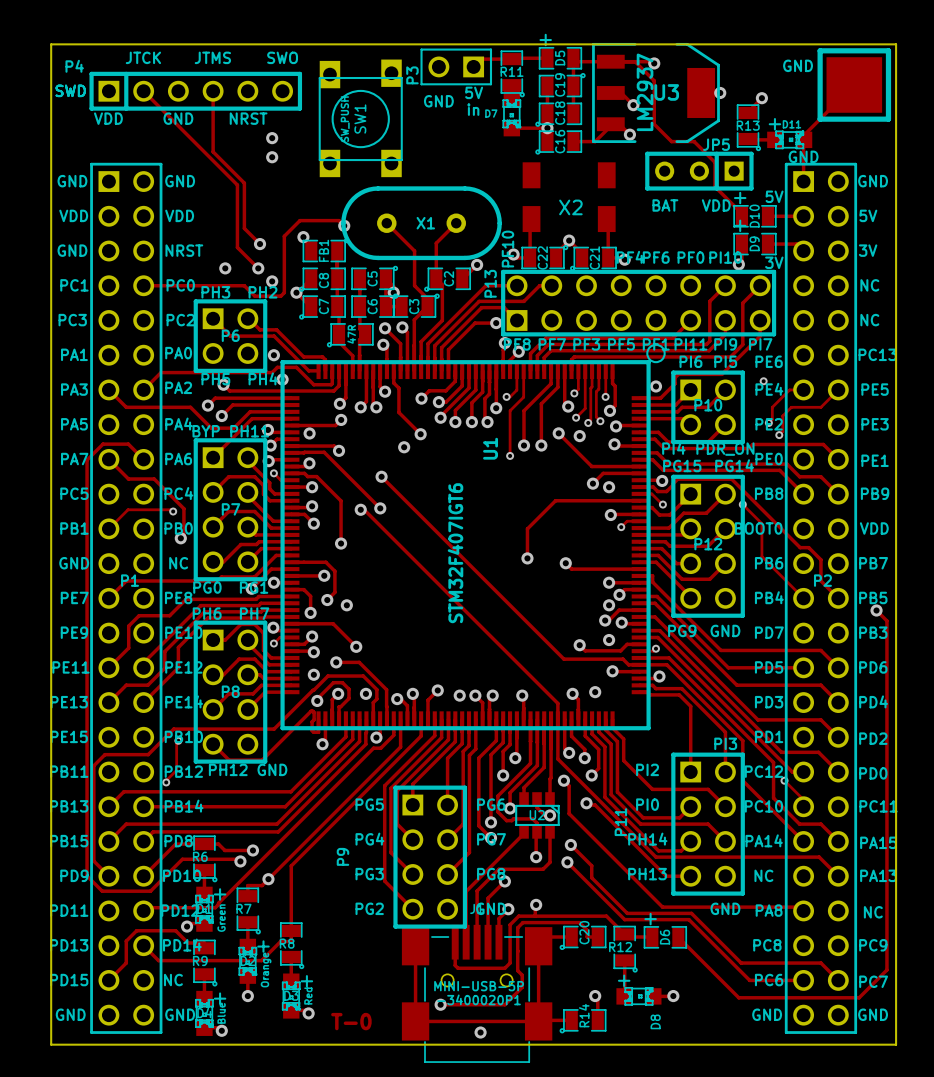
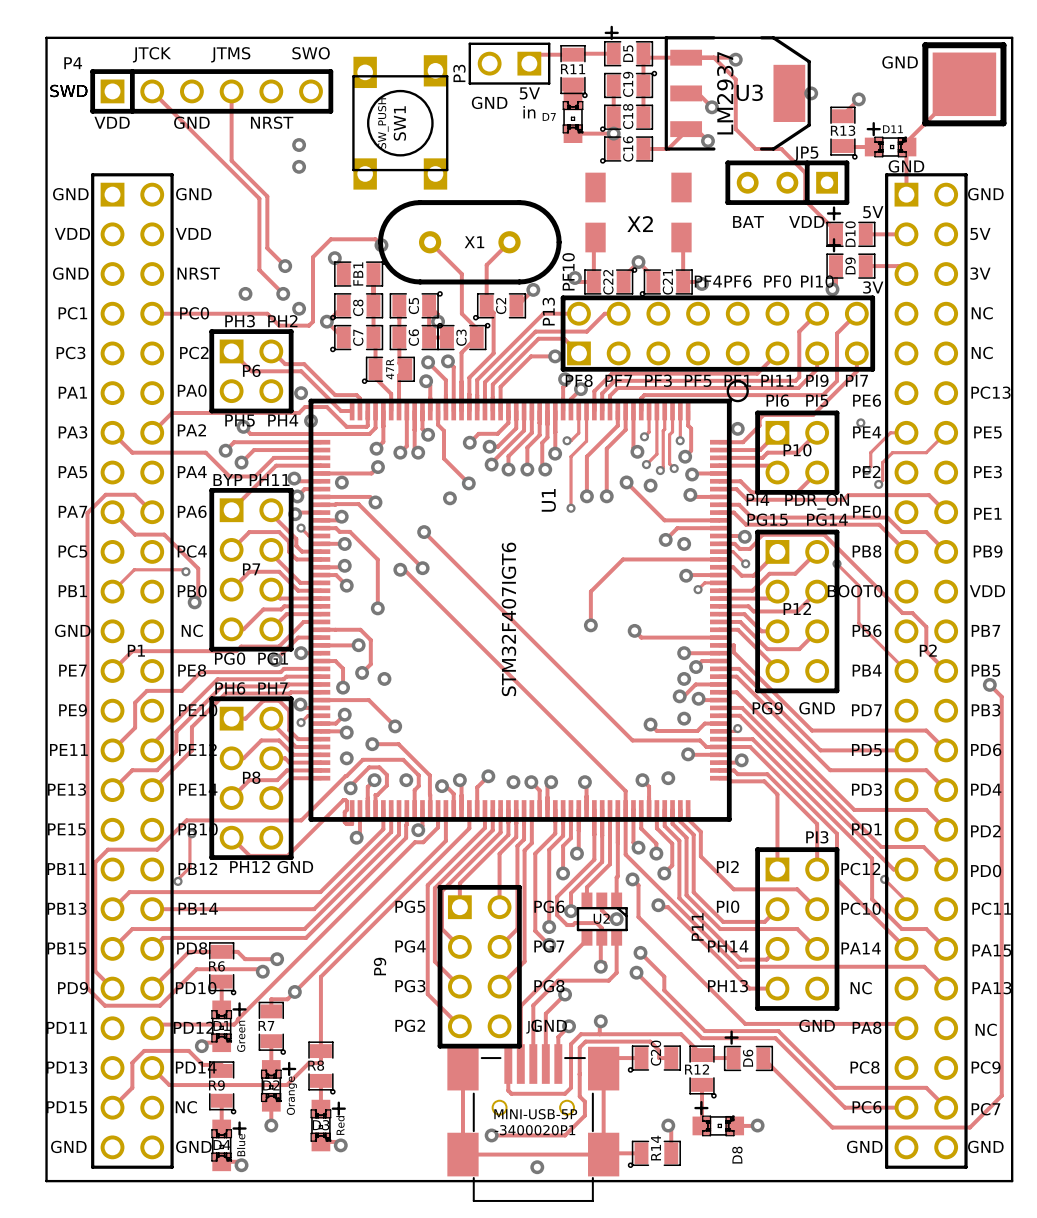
text: T-0 (351, 1021) -> none

